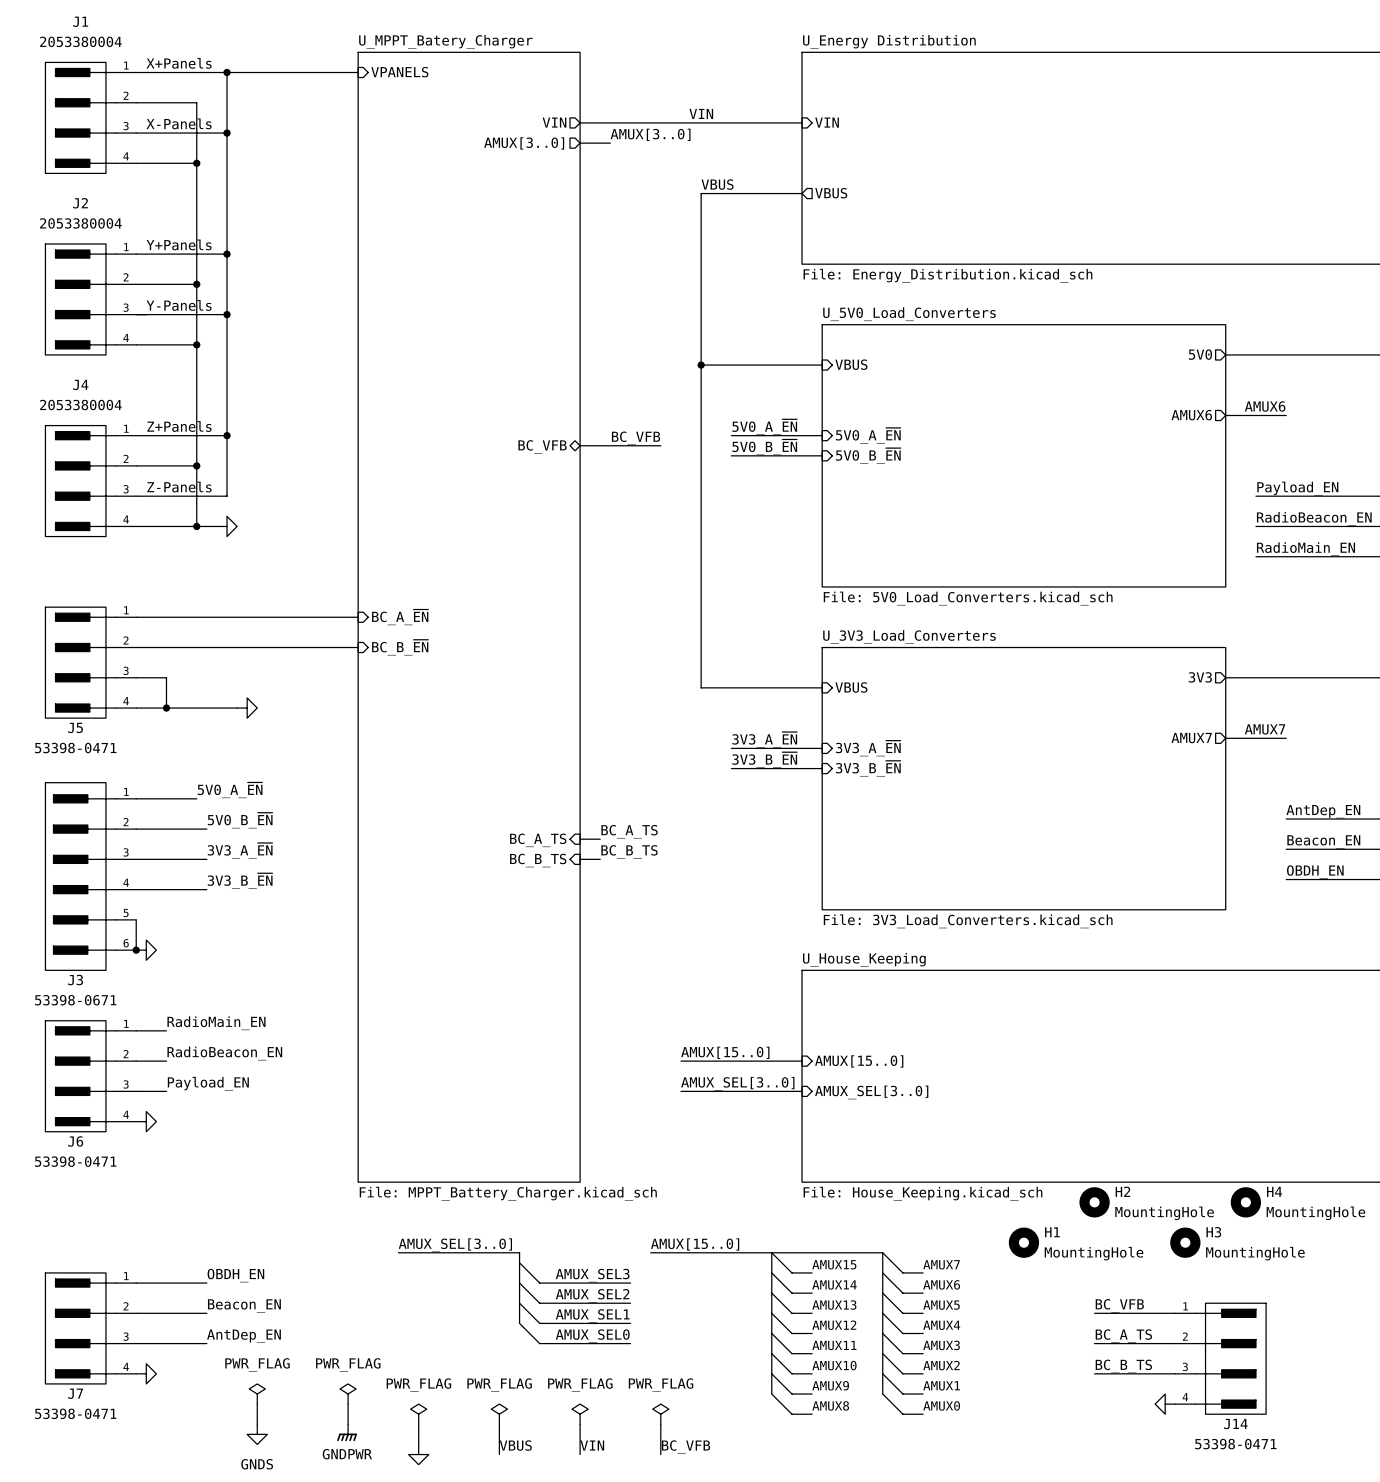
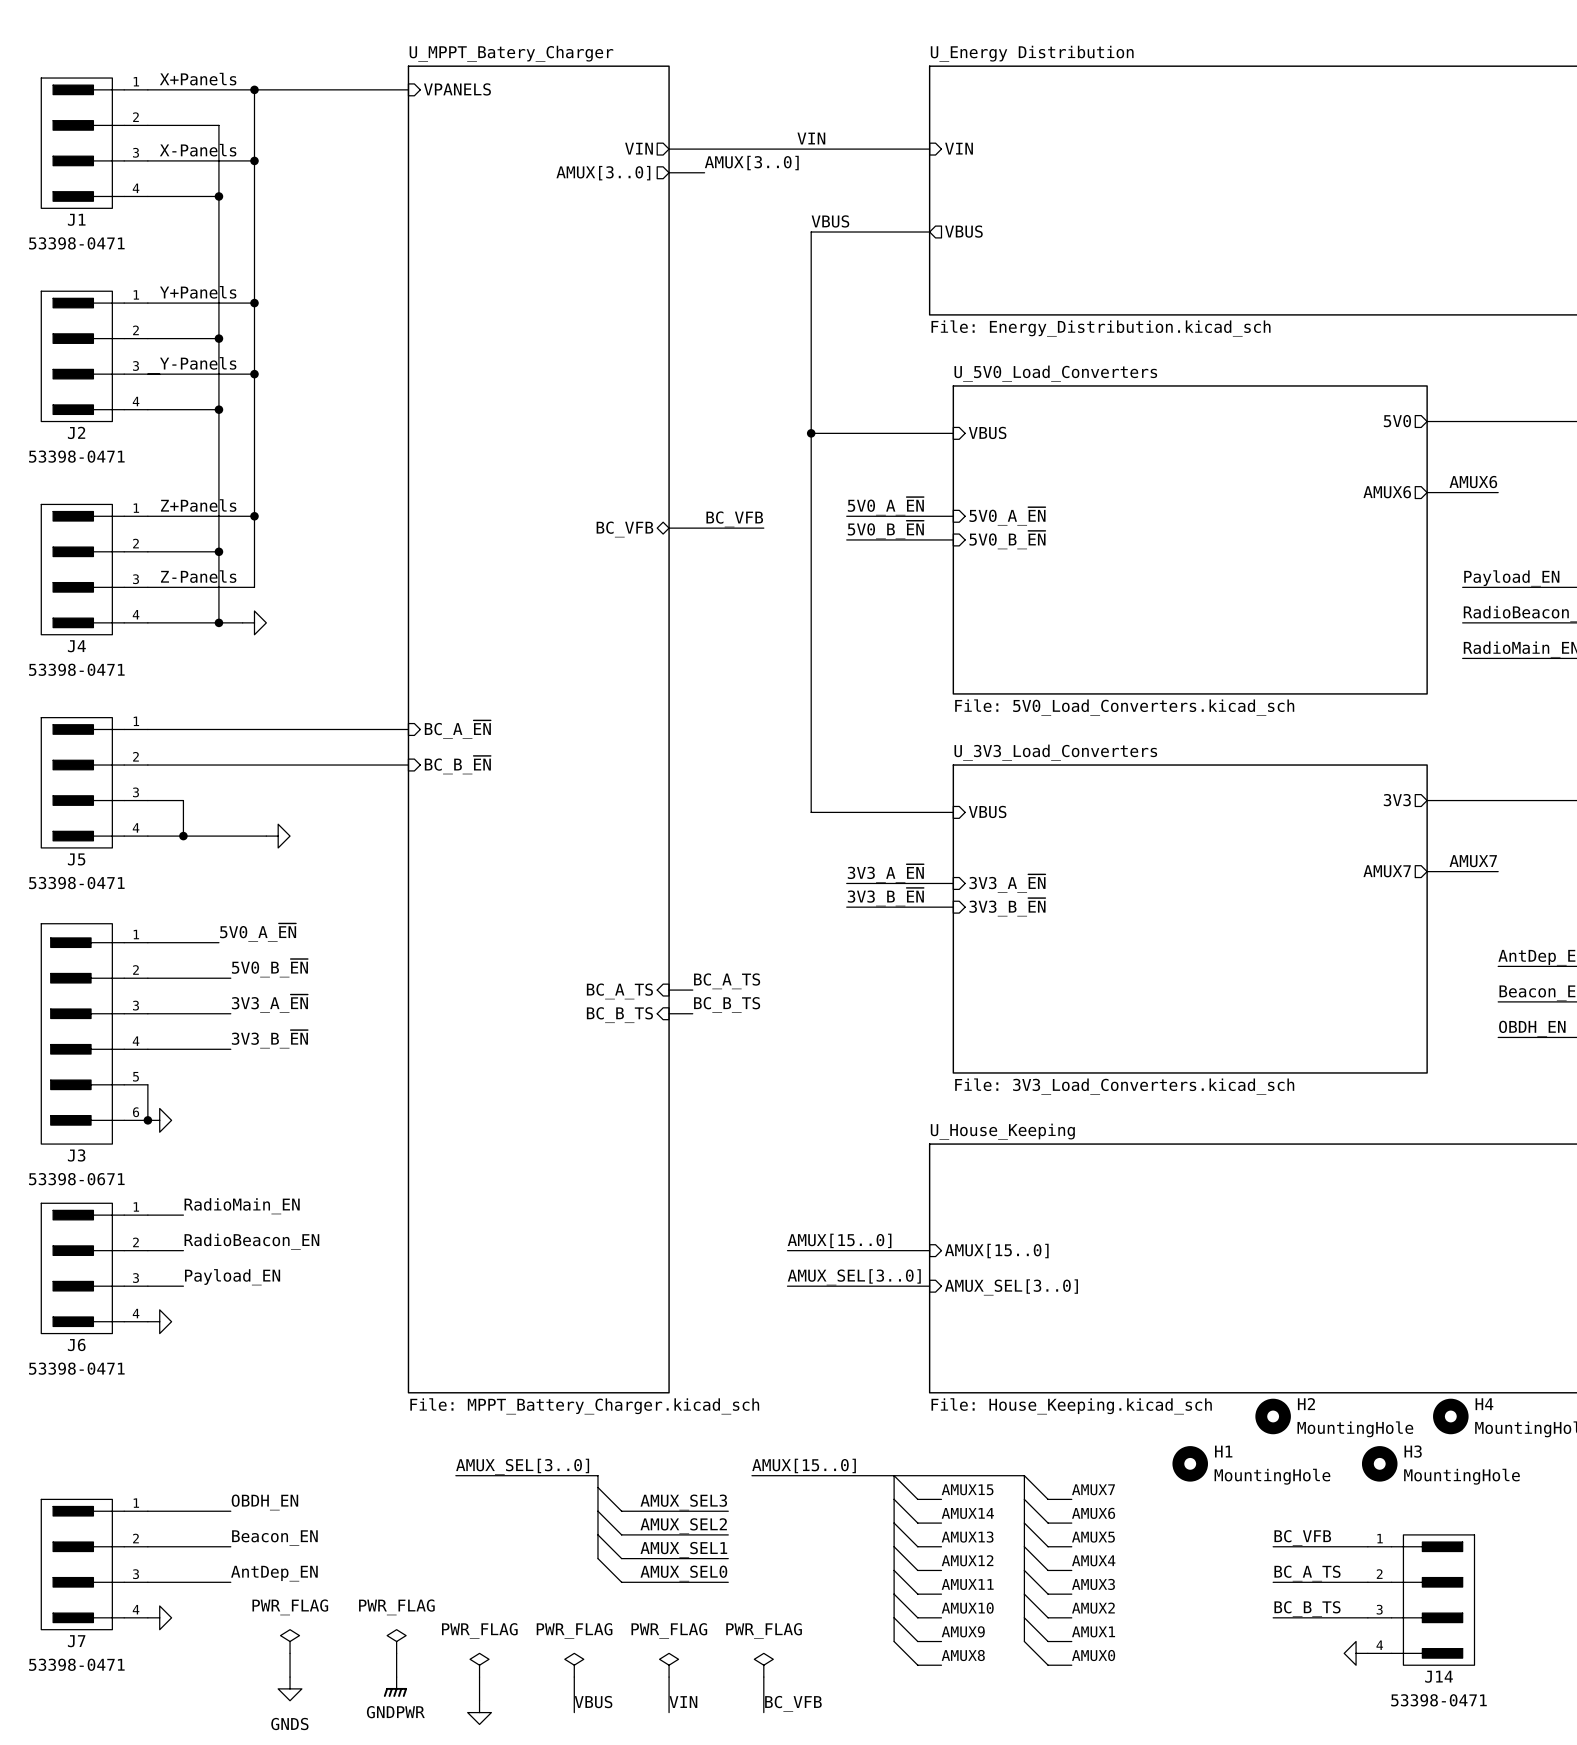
J1 name position: J1 (80, 21) -> J1 (76, 219)
J1 value: 2053380004 (80, 41) -> 53398-0471 (76, 243)
J2 name position: J2 (80, 203) -> J2 (76, 432)
J2 value: 2053380004 (80, 223) -> 53398-0471 (76, 456)
J4 name position: J4 (80, 384) -> J4 (76, 646)
J4 value: 2053380004 (80, 405) -> 53398-0471 (76, 669)

